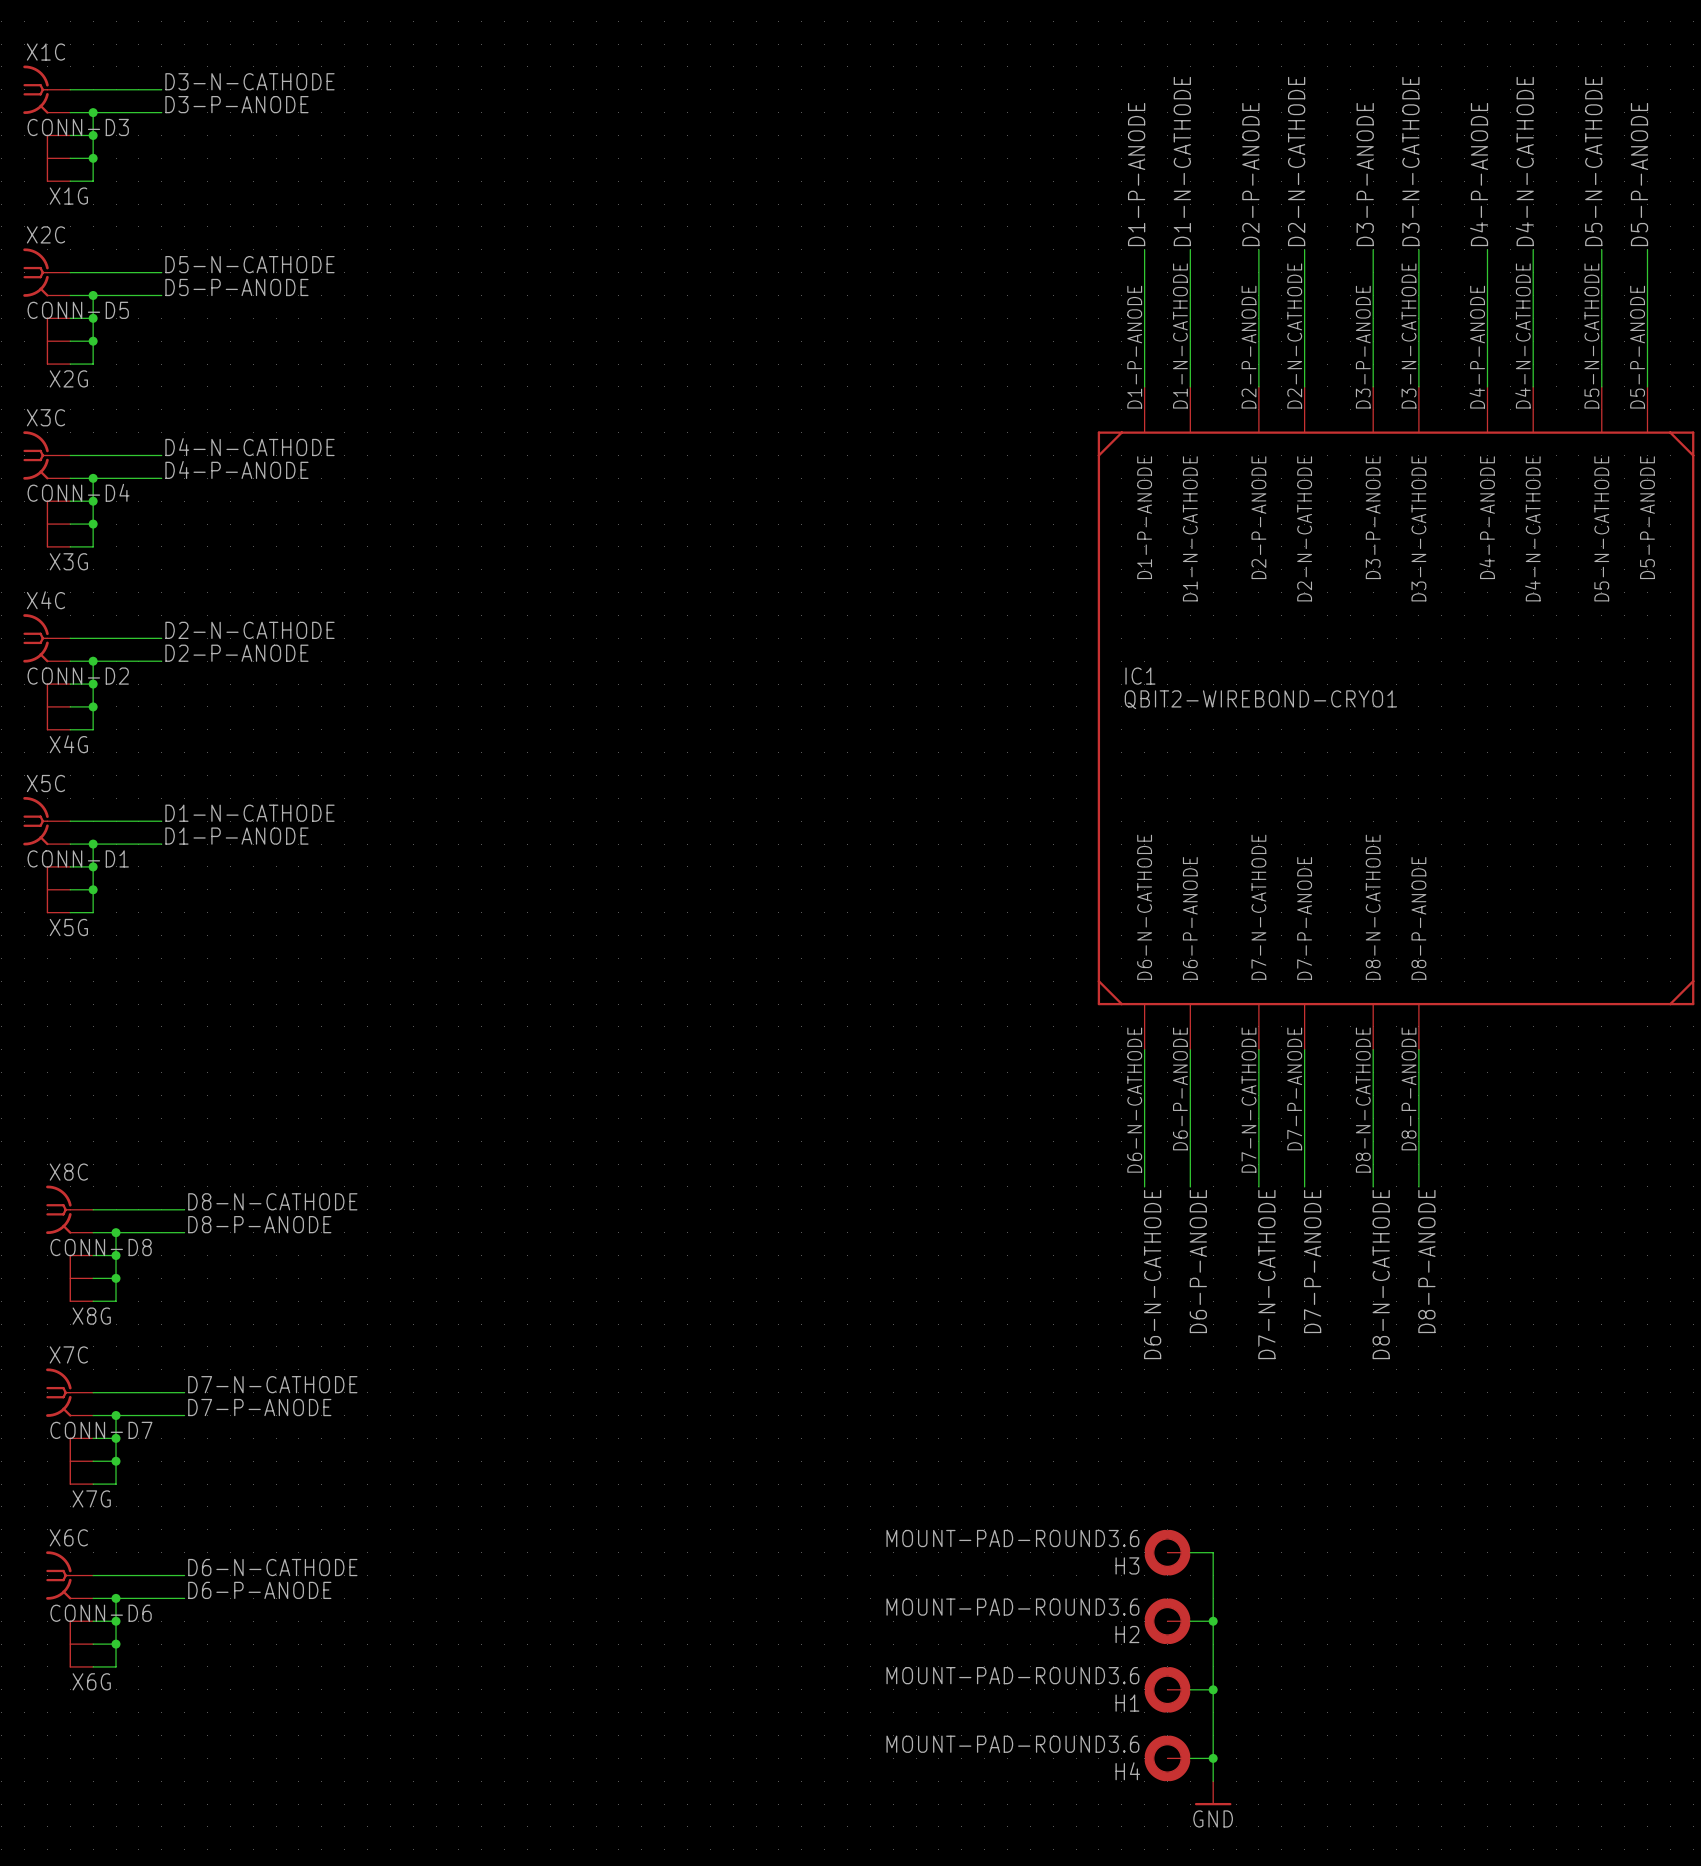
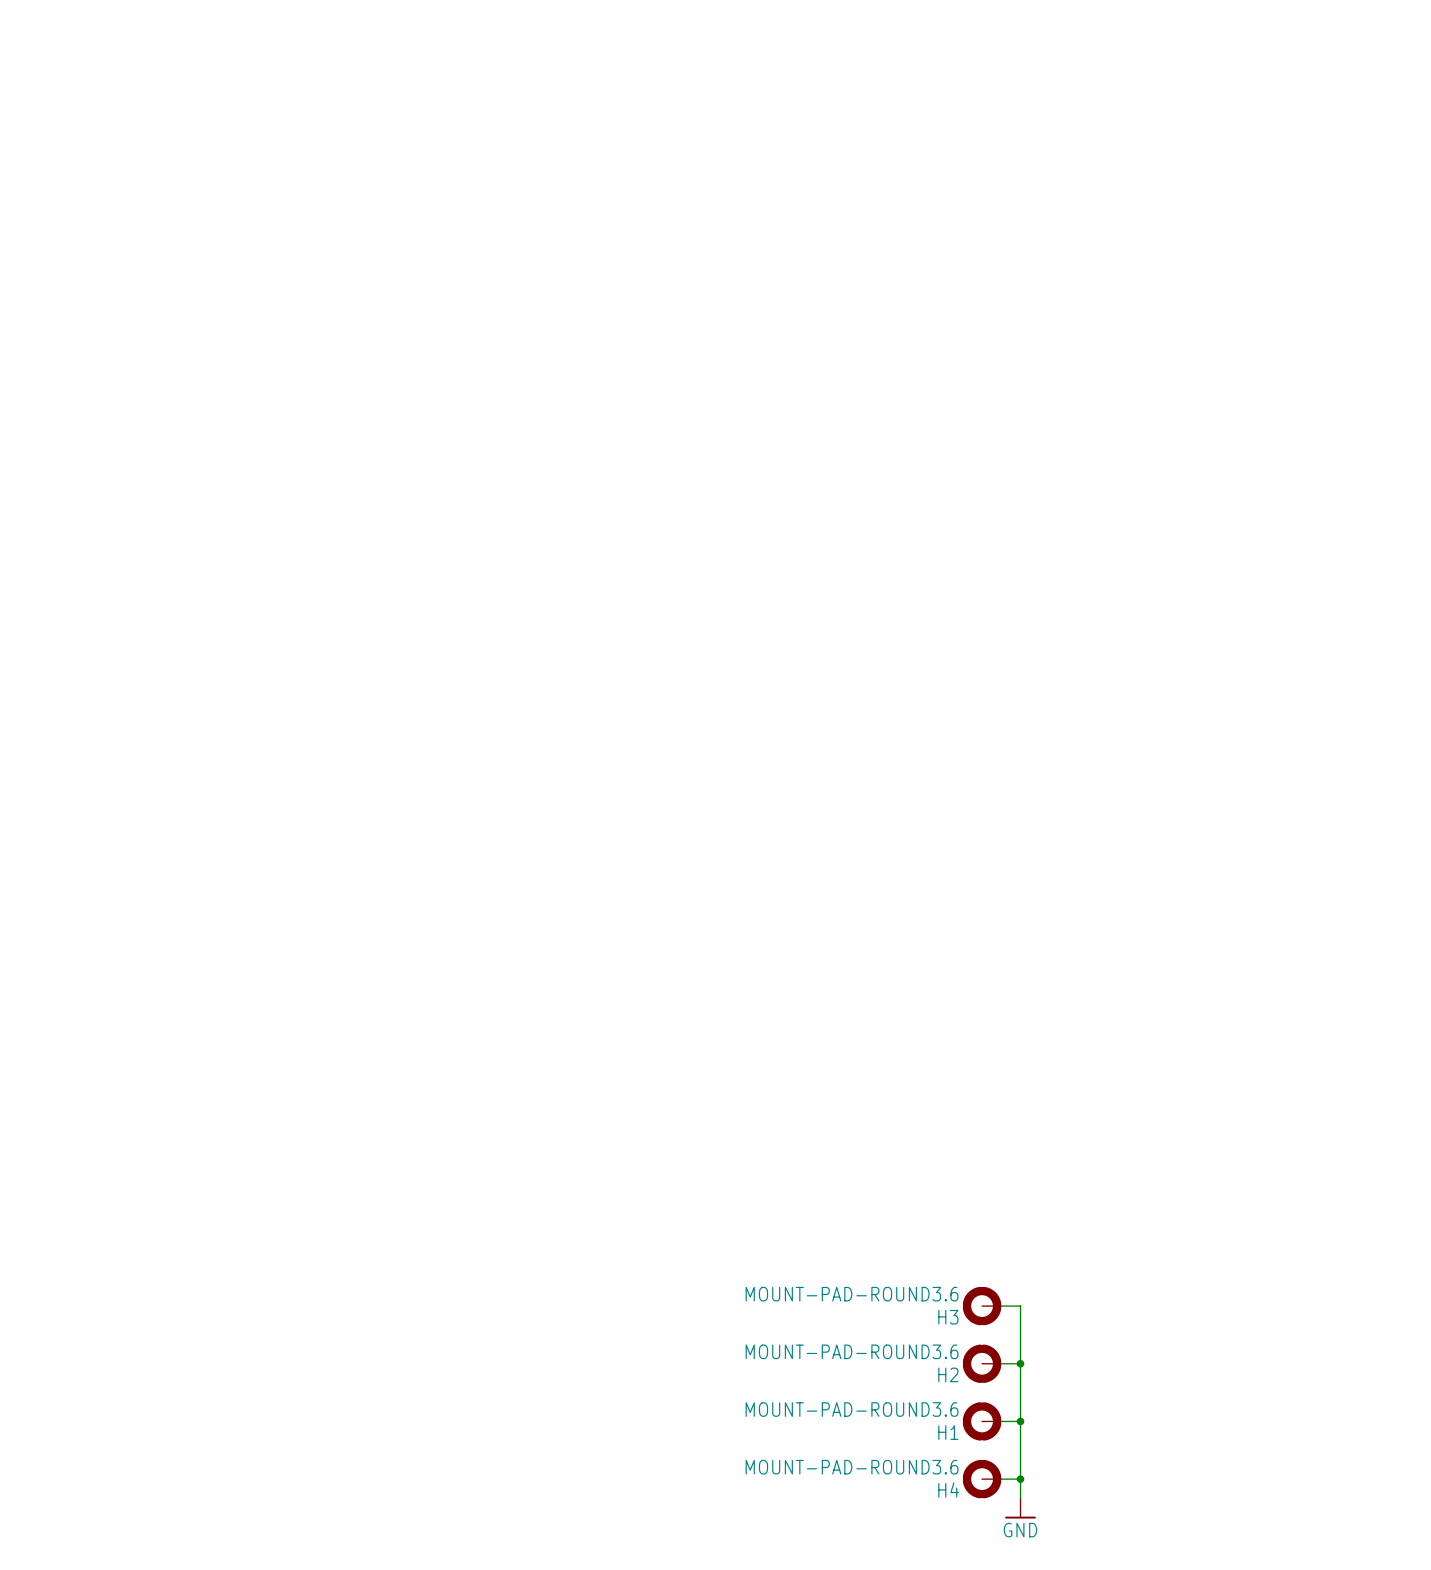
label: D3-N-CATHODE (249, 81) -> none
X1C: CONN-D3 (46, 89) -> none
wire: (70, 89) (161, 89) -> none
label: D3-P-ANODE (236, 104) -> none
wire: (70, 112) (161, 112) -> none
wire: (93, 112) (93, 181) (70, 181) -> none
junction: (93, 112) -> none
wire: (70, 135) (93, 135) -> none
junction: (93, 135) -> none
X1G: (58, 158) -> none
wire: (70, 158) (93, 158) -> none
junction: (93, 158) -> none
label: D1-N-CATHODE (1182, 161) -> none
label: D2-N-CATHODE (1296, 161) -> none
label: D3-N-CATHODE (1410, 161) -> none
label: D4-N-CATHODE (1524, 161) -> none
label: D5-N-CATHODE (1593, 161) -> none
label: D1-P-ANODE (1136, 174) -> none
label: D2-P-ANODE (1250, 174) -> none
label: D3-P-ANODE (1365, 174) -> none
label: D4-P-ANODE (1479, 174) -> none
label: D5-P-ANODE (1639, 174) -> none
wire: (1144, 249) (1144, 386) -> none
wire: (1190, 249) (1190, 386) -> none
wire: (1258, 249) (1258, 386) -> none
wire: (1304, 249) (1304, 386) -> none
wire: (1373, 249) (1373, 386) -> none
wire: (1418, 249) (1418, 386) -> none
wire: (1487, 249) (1487, 386) -> none
wire: (1533, 249) (1533, 386) -> none
wire: (1601, 249) (1601, 386) -> none
wire: (1647, 249) (1647, 386) -> none
label: D5-N-CATHODE (249, 264) -> none
X2C: CONN-D5 (46, 272) -> none
wire: (70, 272) (161, 272) -> none
label: D5-P-ANODE (236, 287) -> none
wire: (70, 295) (161, 295) -> none
wire: (93, 295) (93, 364) (70, 364) -> none
junction: (93, 295) -> none
wire: (70, 318) (93, 318) -> none
junction: (93, 318) -> none
X2G: (58, 341) -> none
wire: (70, 341) (93, 341) -> none
junction: (93, 341) -> none
label: D4-N-CATHODE (249, 447) -> none
X3C: CONN-D4 (46, 455) -> none
wire: (70, 455) (161, 455) -> none
label: D4-P-ANODE (236, 469) -> none
wire: (70, 478) (161, 478) -> none
wire: (93, 478) (93, 546) (70, 546) -> none
junction: (93, 478) -> none
wire: (70, 501) (93, 501) -> none
junction: (93, 501) -> none
X3G: (58, 524) -> none
wire: (70, 524) (93, 524) -> none
junction: (93, 524) -> none
label: D2-N-CATHODE (249, 630) -> none
X4C: CONN-D2 (46, 638) -> none
wire: (70, 638) (161, 638) -> none
label: D2-P-ANODE (236, 653) -> none
wire: (70, 661) (161, 661) -> none
wire: (93, 661) (93, 729) (70, 729) -> none
junction: (93, 661) -> none
wire: (70, 684) (93, 684) -> none
junction: (93, 684) -> none
X4G: (58, 706) -> none
wire: (70, 706) (93, 706) -> none
junction: (93, 706) -> none
IC1: QBIT2-WIREBOND-CRYO1 (1396, 718) -> none
label: D1-N-CATHODE (249, 813) -> none
X5C: CONN-D1 (46, 821) -> none
wire: (70, 821) (161, 821) -> none
label: D1-P-ANODE (236, 836) -> none
wire: (70, 844) (161, 844) -> none
wire: (93, 844) (93, 912) (70, 912) -> none
junction: (93, 844) -> none
wire: (70, 866) (93, 866) -> none
junction: (93, 866) -> none
X5G: (58, 889) -> none
wire: (70, 889) (93, 889) -> none
junction: (93, 889) -> none
wire: (1144, 1049) (1144, 1186) -> none
wire: (1190, 1049) (1190, 1186) -> none
wire: (1258, 1049) (1258, 1186) -> none
wire: (1304, 1049) (1304, 1186) -> none
wire: (1373, 1049) (1373, 1186) -> none
wire: (1418, 1049) (1418, 1186) -> none
label: D8-N-CATHODE (272, 1201) -> none
X8C: CONN-D8 (69, 1209) -> none
wire: (93, 1209) (184, 1209) -> none
label: D8-P-ANODE (259, 1224) -> none
wire: (93, 1232) (184, 1232) -> none
wire: (116, 1232) (116, 1301) (93, 1301) -> none
junction: (116, 1232) -> none
wire: (93, 1255) (116, 1255) -> none
junction: (116, 1255) -> none
label: D6-P-ANODE (1198, 1261) -> none
label: D7-P-ANODE (1312, 1261) -> none
label: D8-P-ANODE (1426, 1261) -> none
label: D6-N-CATHODE (1152, 1274) -> none
label: D7-N-CATHODE (1266, 1274) -> none
label: D8-N-CATHODE (1381, 1274) -> none
X8G: (81, 1278) -> none
wire: (93, 1278) (116, 1278) -> none
junction: (116, 1278) -> none
label: D7-N-CATHODE (272, 1384) -> none
X7C: CONN-D7 (69, 1392) -> none
wire: (93, 1392) (184, 1392) -> none
label: D7-P-ANODE (259, 1407) -> none
wire: (93, 1415) (184, 1415) -> none
wire: (116, 1415) (116, 1484) (93, 1484) -> none
junction: (116, 1415) -> none
wire: (93, 1438) (116, 1438) -> none
junction: (116, 1438) -> none
X7G: (81, 1461) -> none
wire: (93, 1461) (116, 1461) -> none
junction: (116, 1461) -> none
label: D6-N-CATHODE (272, 1567) -> none
X6C: CONN-D6 (69, 1575) -> none
wire: (93, 1575) (184, 1575) -> none
label: D6-P-ANODE (259, 1590) -> none
wire: (93, 1598) (184, 1598) -> none
wire: (116, 1598) (116, 1666) (93, 1666) -> none
junction: (116, 1598) -> none
wire: (93, 1621) (116, 1621) -> none
junction: (116, 1621) -> none
X6G: (81, 1644) -> none
wire: (93, 1644) (116, 1644) -> none
junction: (116, 1644) -> none

